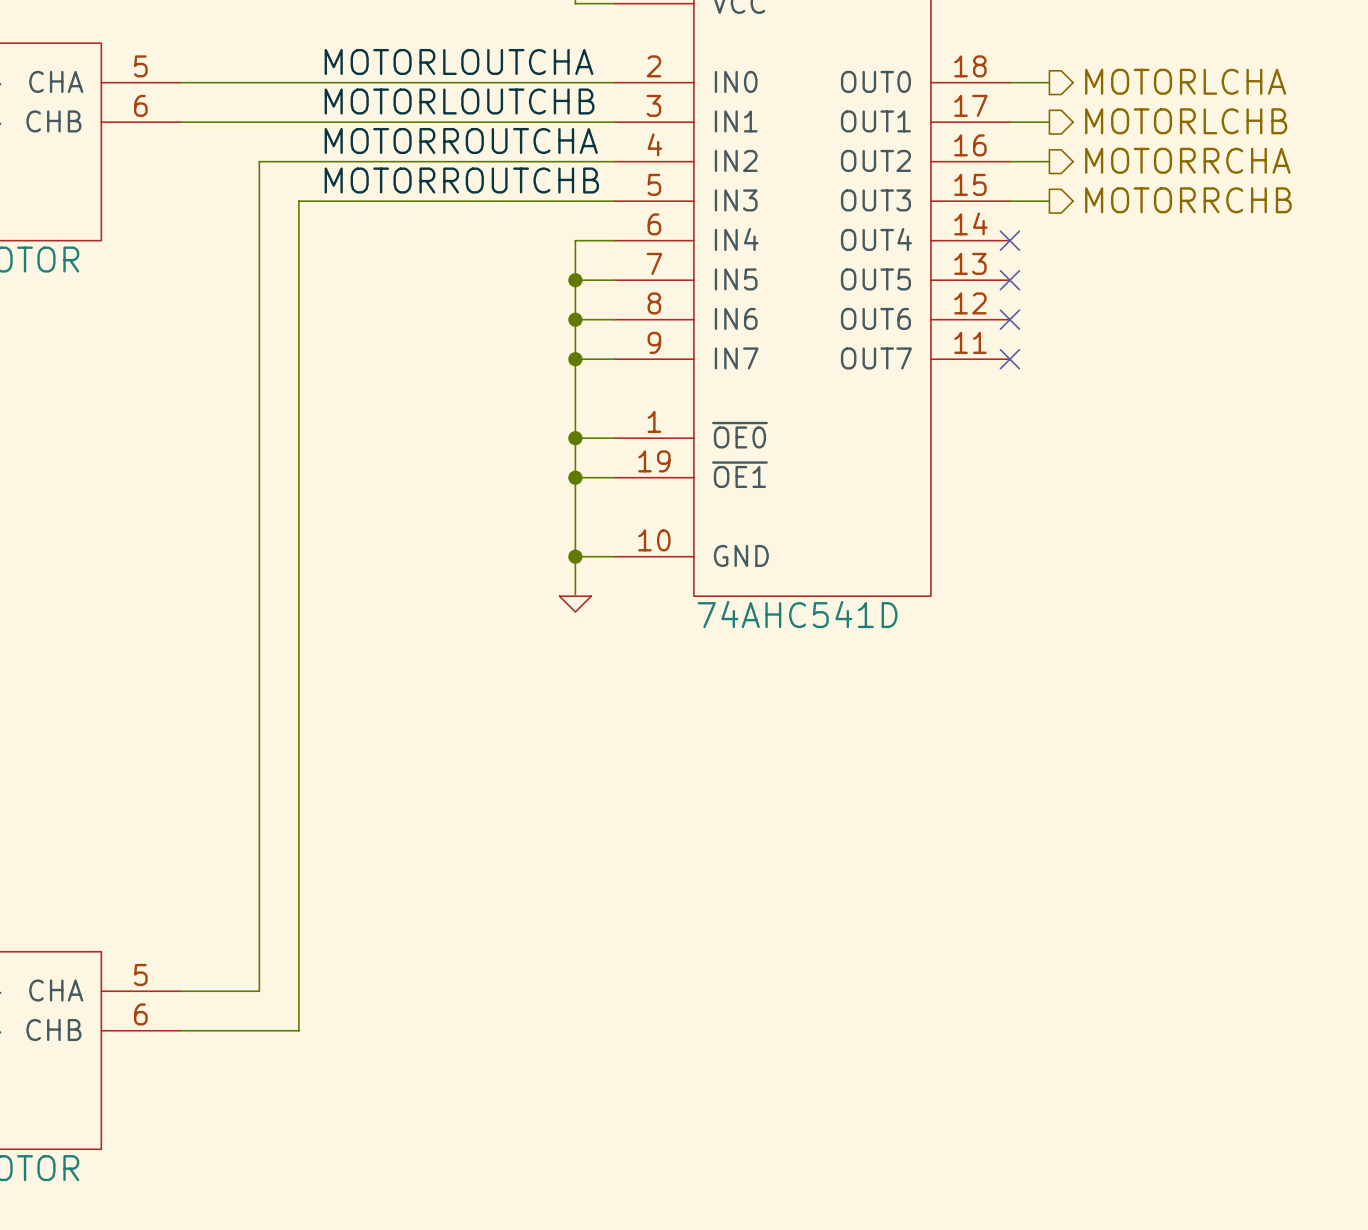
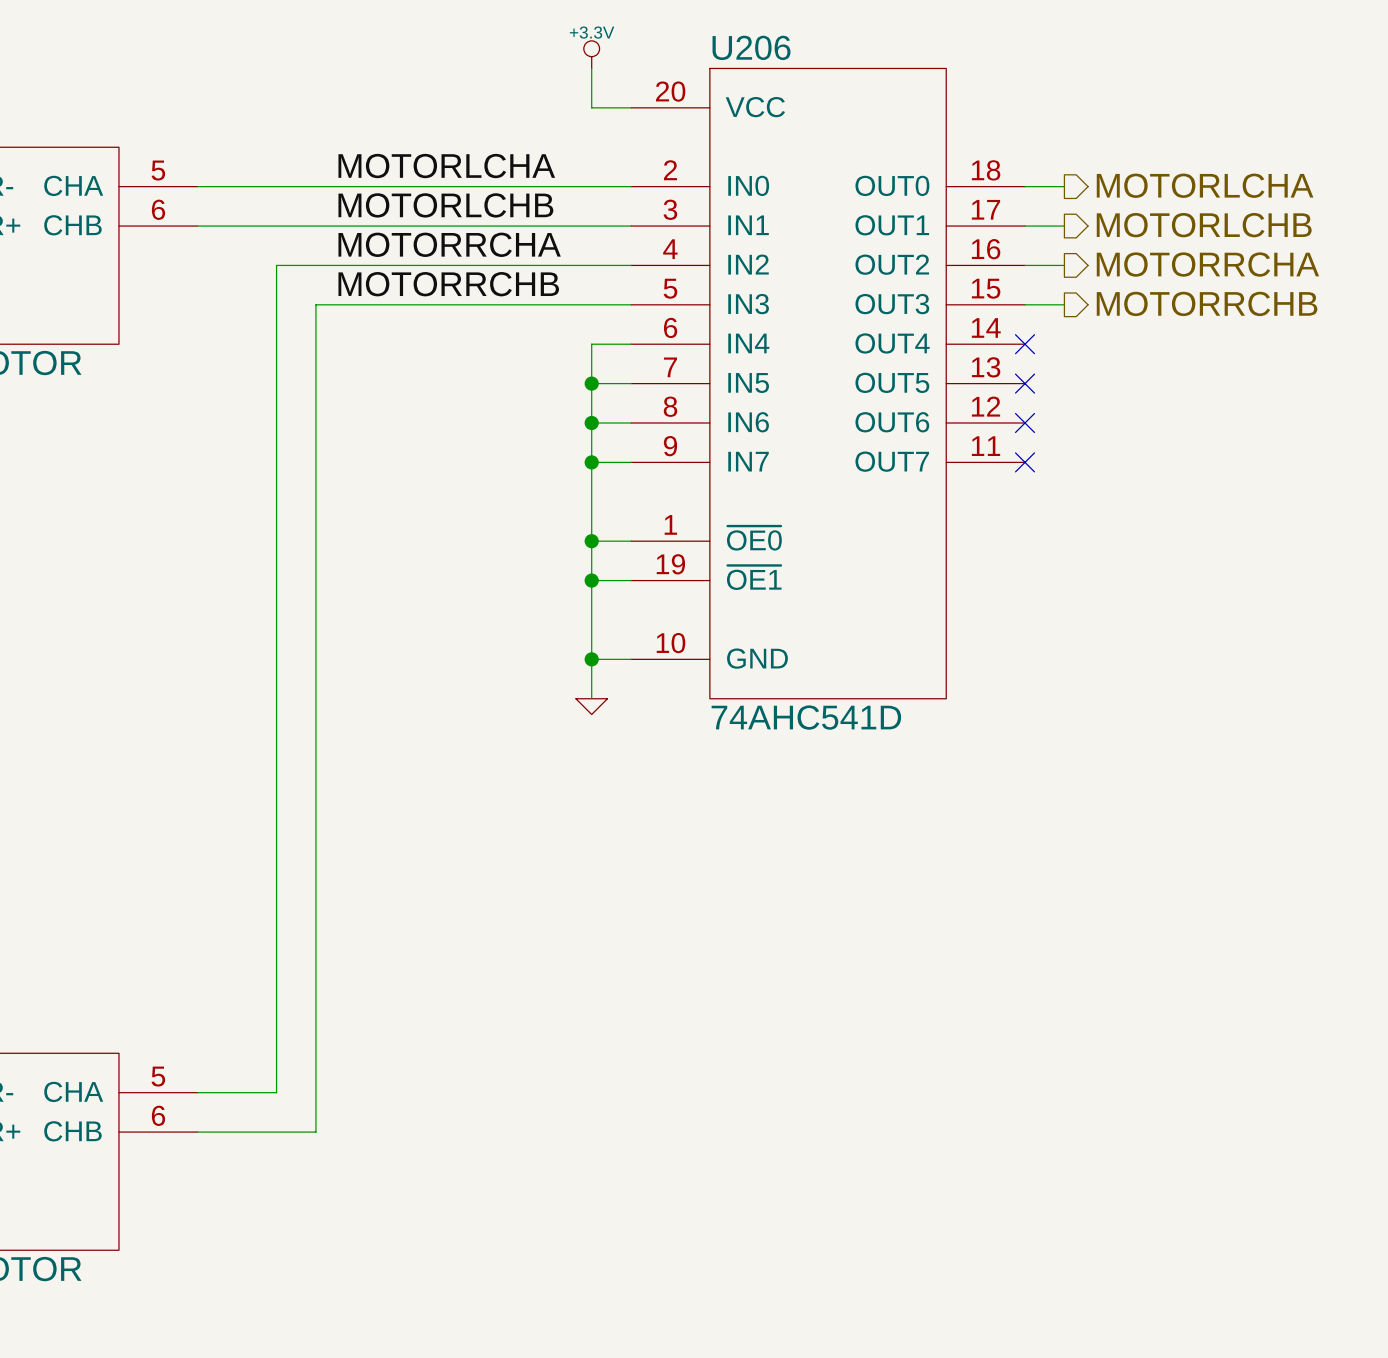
label: MOTORLOUTCHA (459, 61) -> MOTORLCHA (446, 166)
label: MOTORLOUTCHB (459, 101) -> MOTORLCHB (445, 205)
label: MOTORROUTCHA (461, 140) -> MOTORRCHA (449, 244)
label: MOTORROUTCHB (461, 180) -> MOTORRCHB (448, 284)

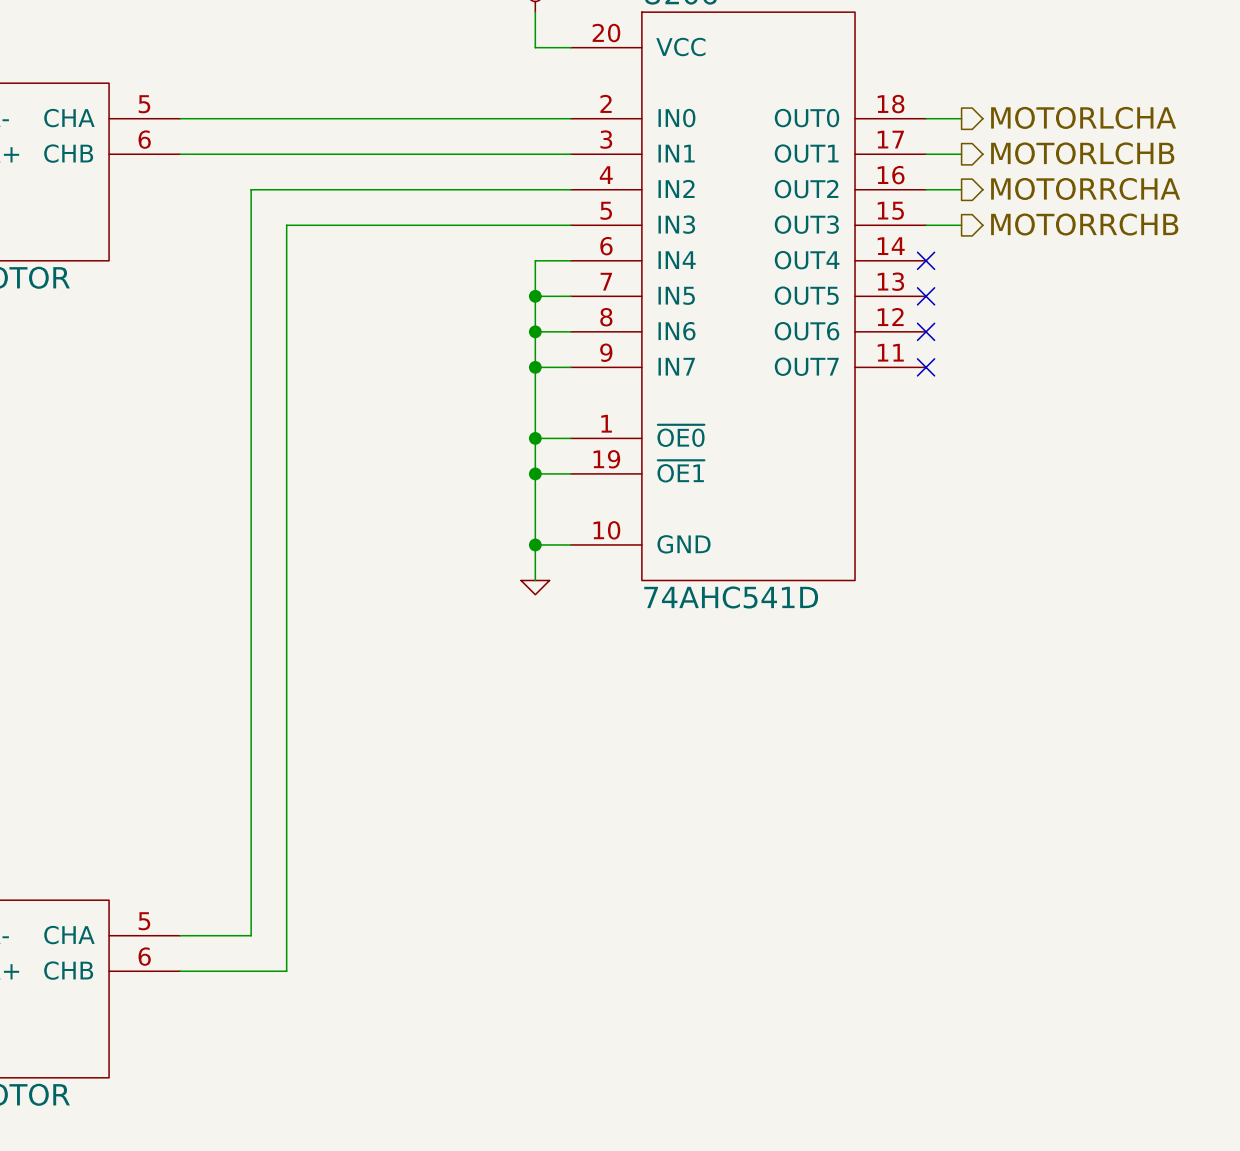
label: MOTORLCHA (446, 166) -> none
label: MOTORLCHB (445, 205) -> none
label: MOTORRCHA (449, 244) -> none
label: MOTORRCHB (448, 284) -> none

